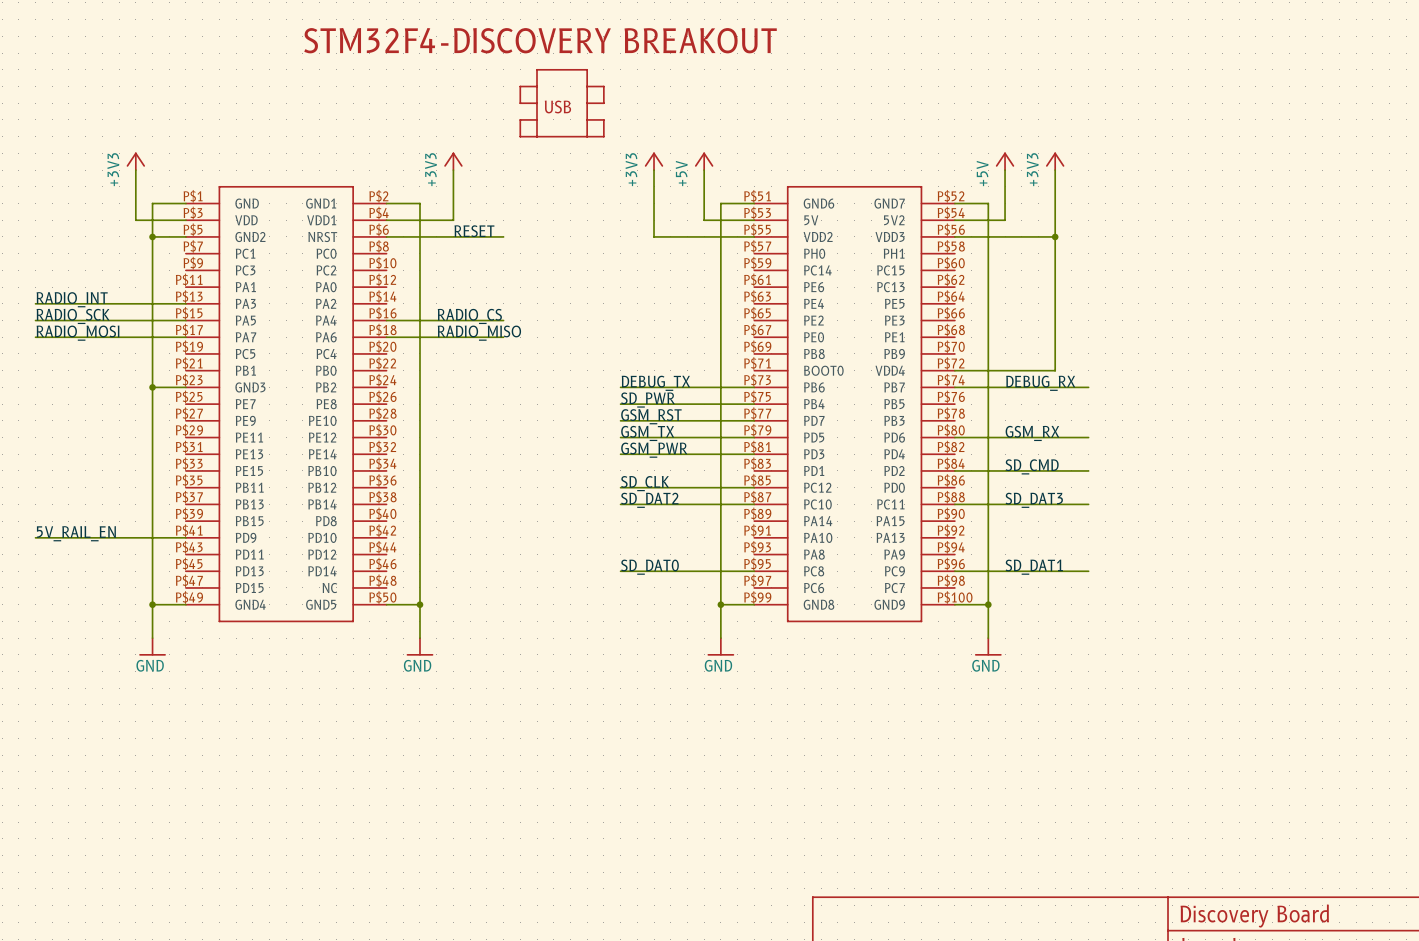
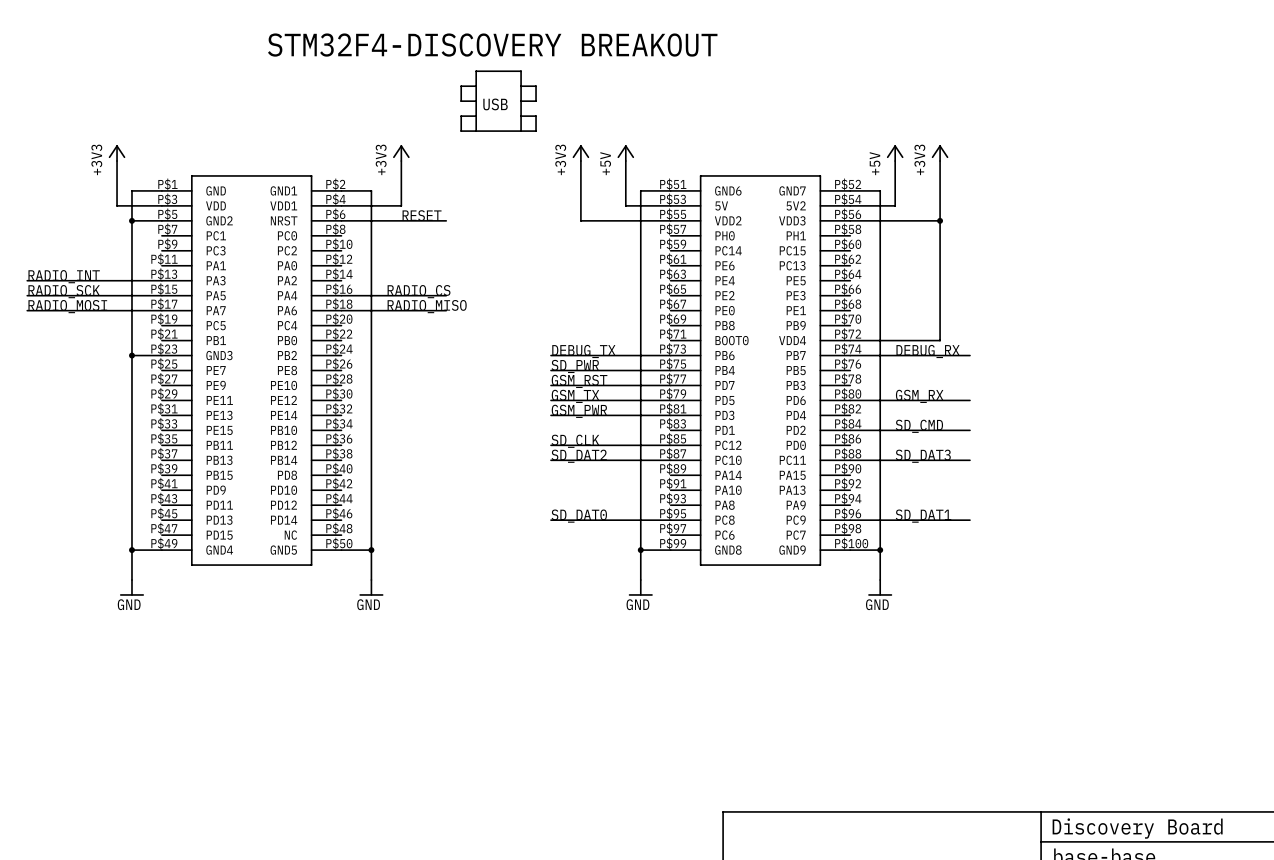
label: 5V_RAIL_EN (76, 533) -> none
wire: (35, 537) (185, 537) -> none

